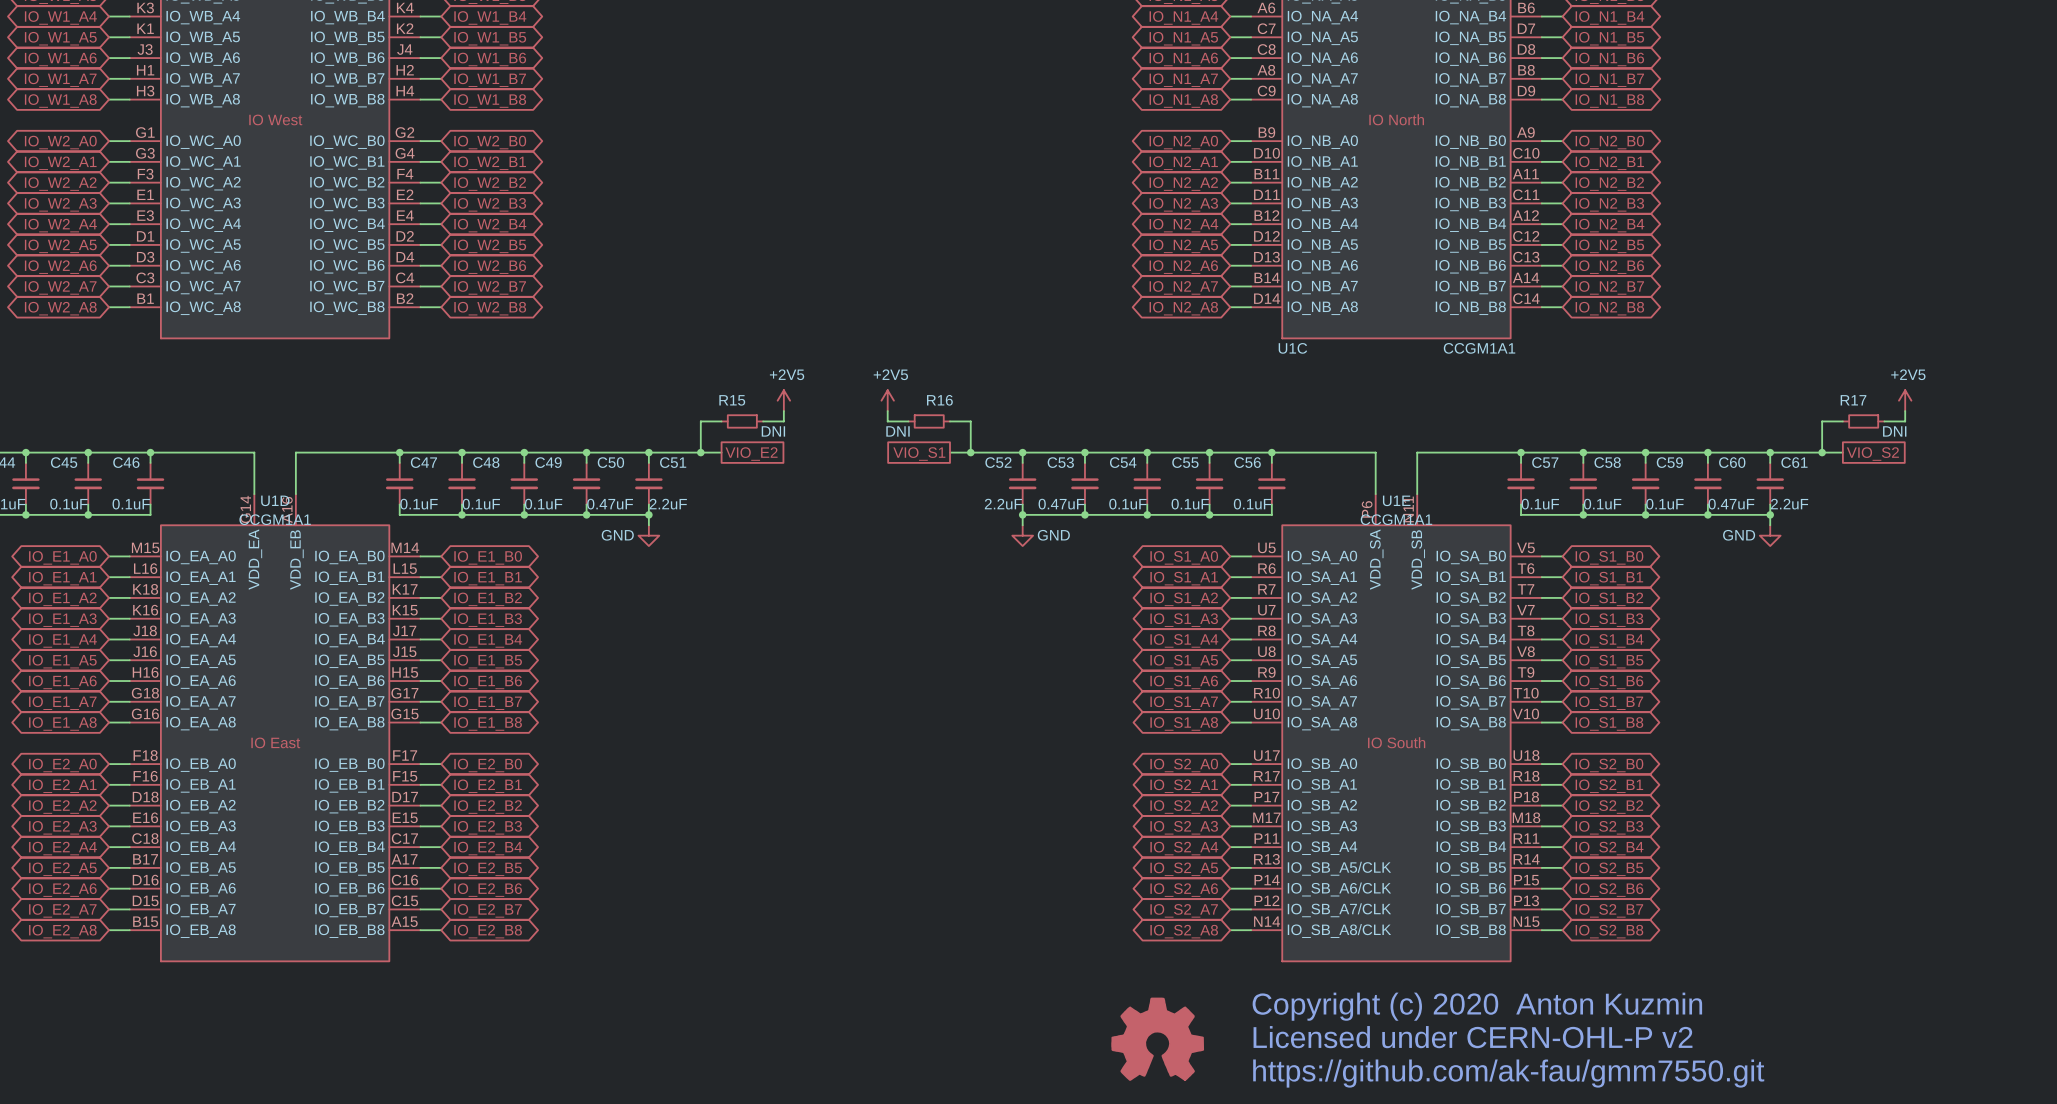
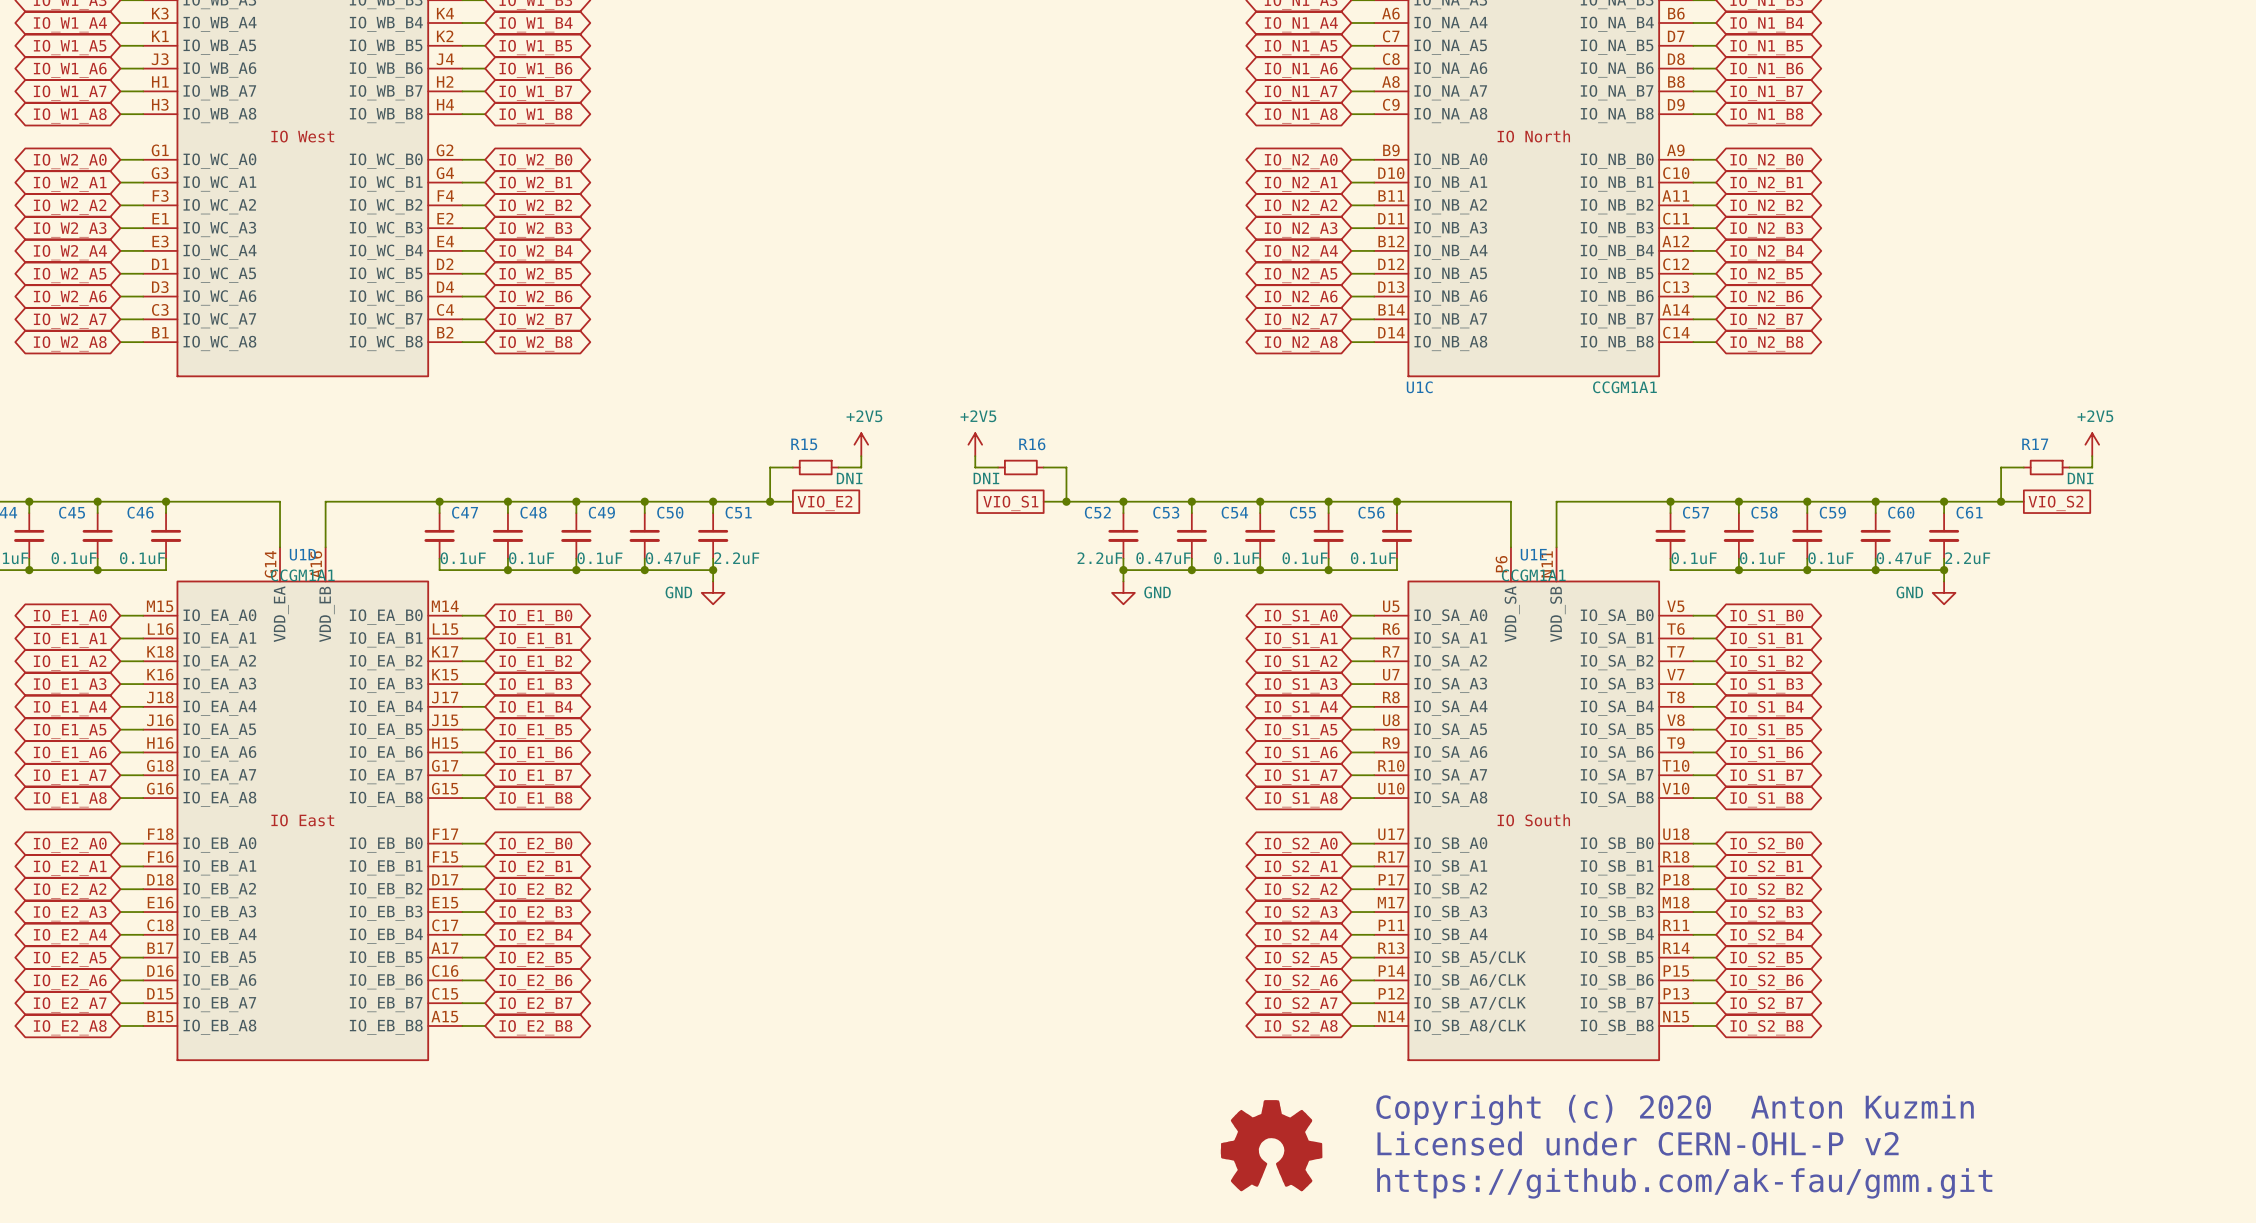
text: https://github.com/ak-fau/gmm7550.git (1508, 1073) -> https://github.com/ak-fau/gmm.git (1684, 1183)

